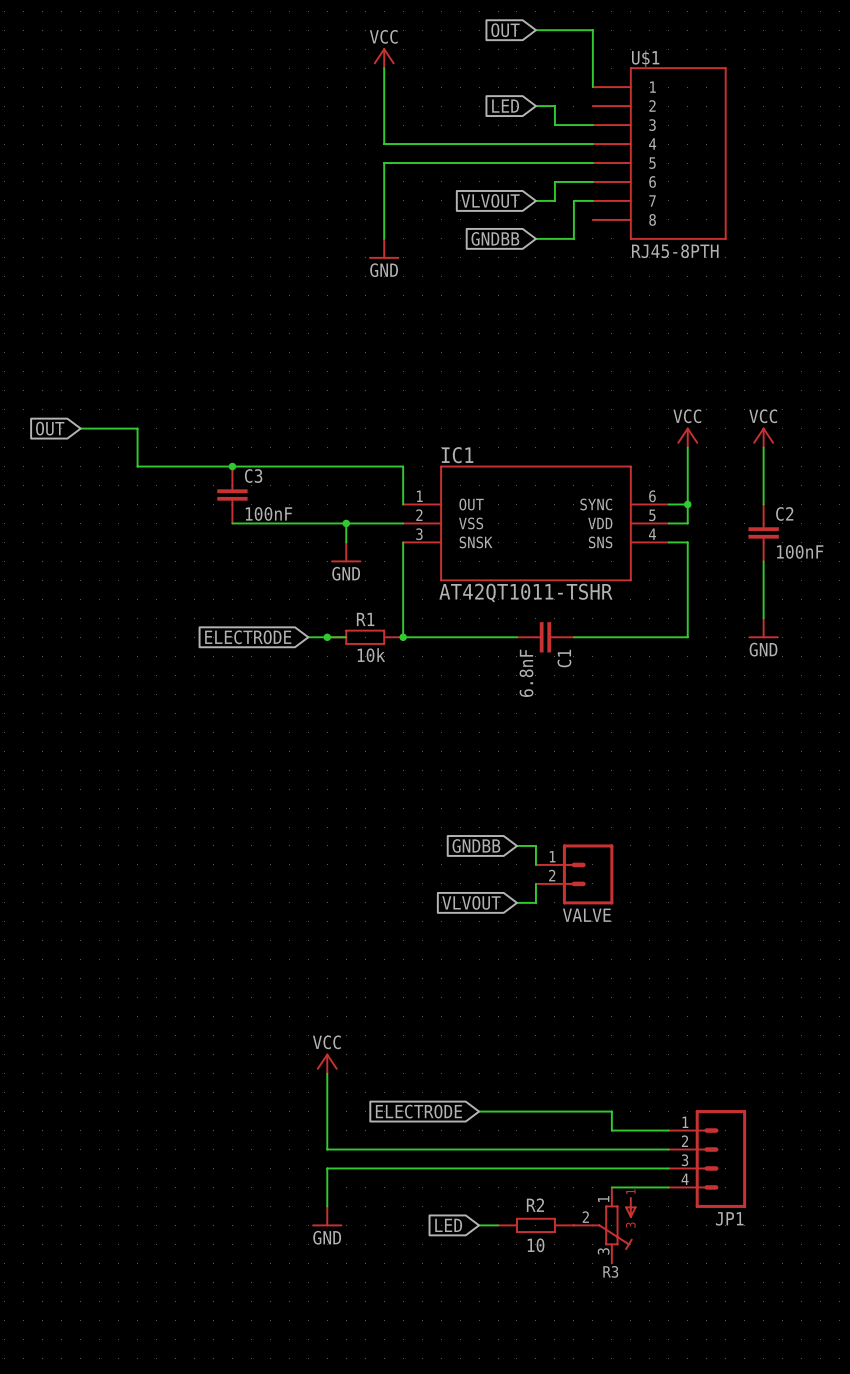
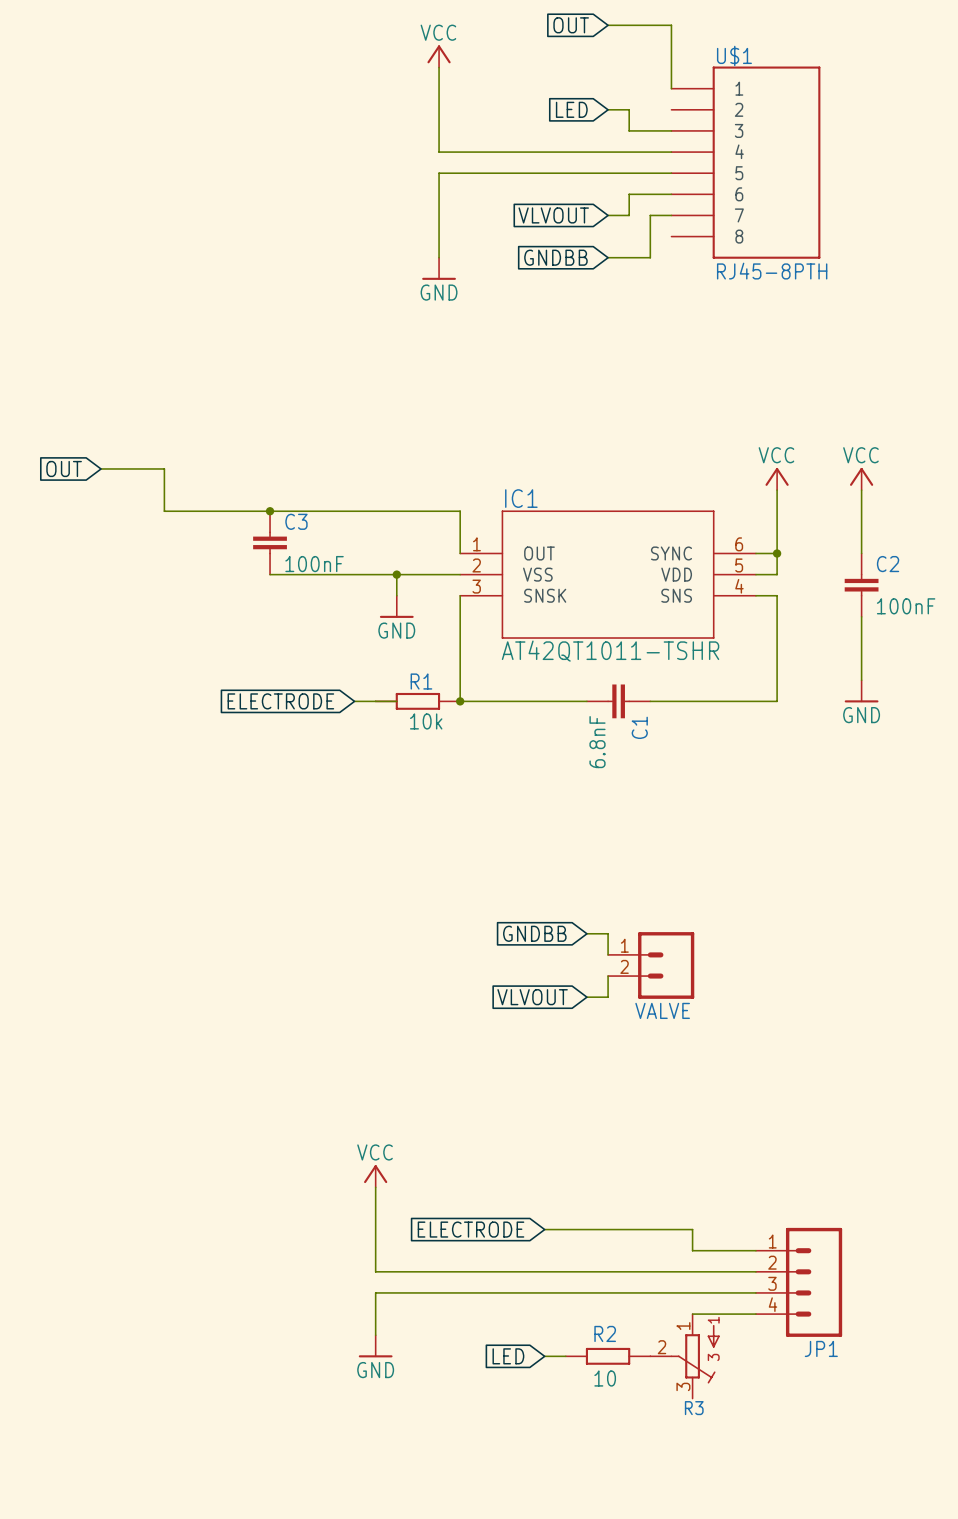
junction: (327, 637) -> none

